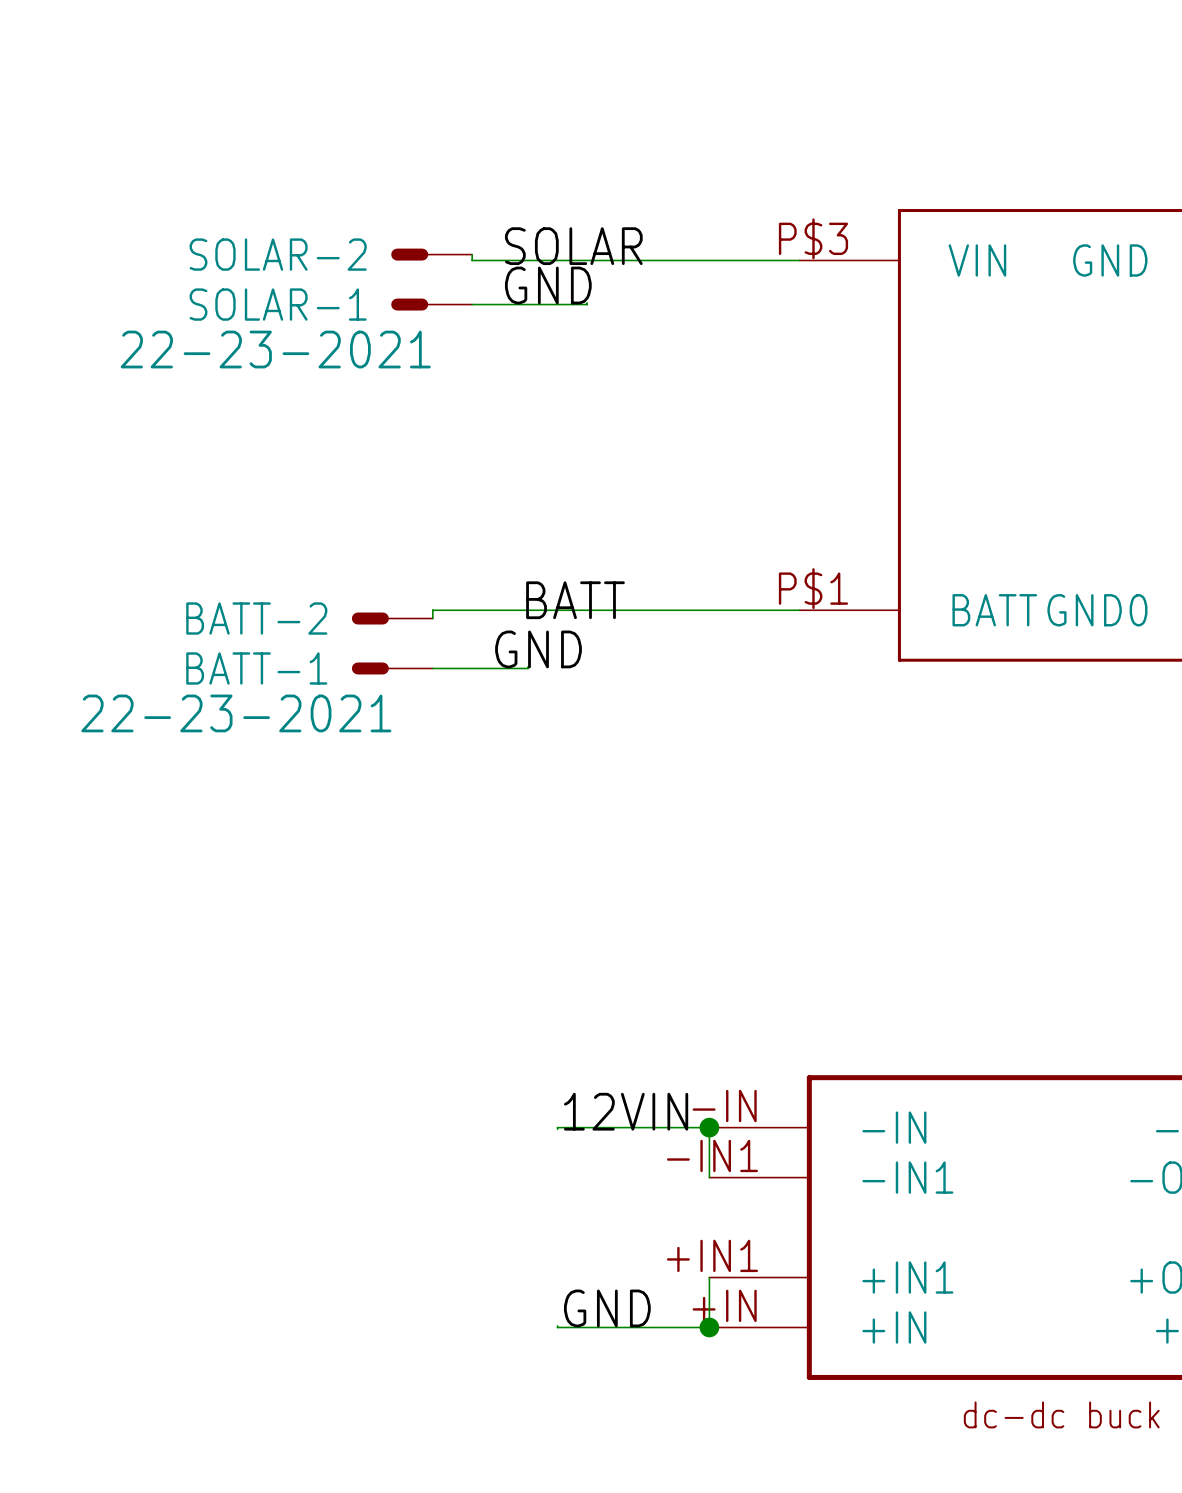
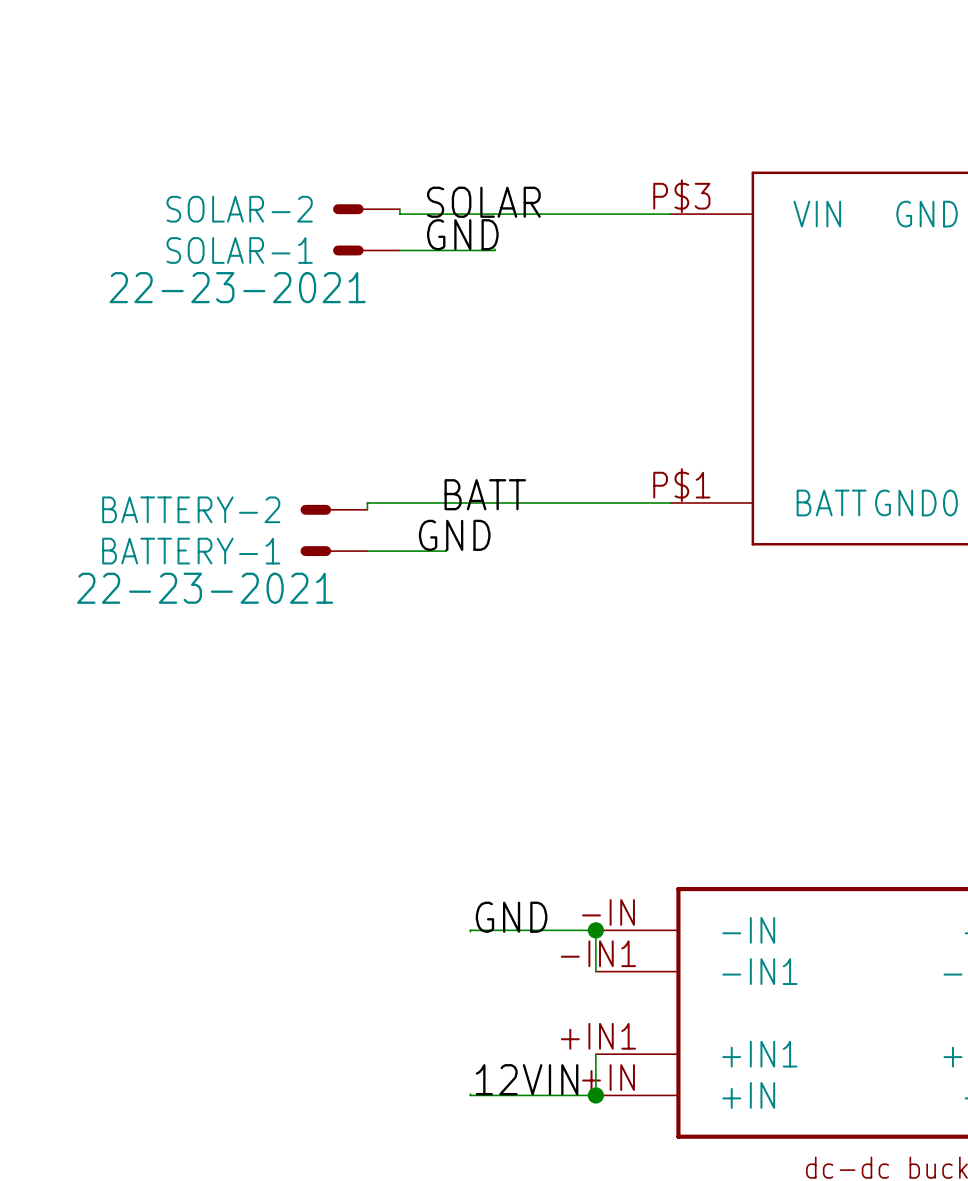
BATT-2 name: BATT-2 (256, 618) -> BATTERY-2 (191, 509)
BATT-1 name: BATT-1 (256, 668) -> BATTERY-1 (191, 551)
label: 12VIN (626, 1111) -> GND (511, 917)
label: GND (607, 1308) -> 12VIN (527, 1079)

